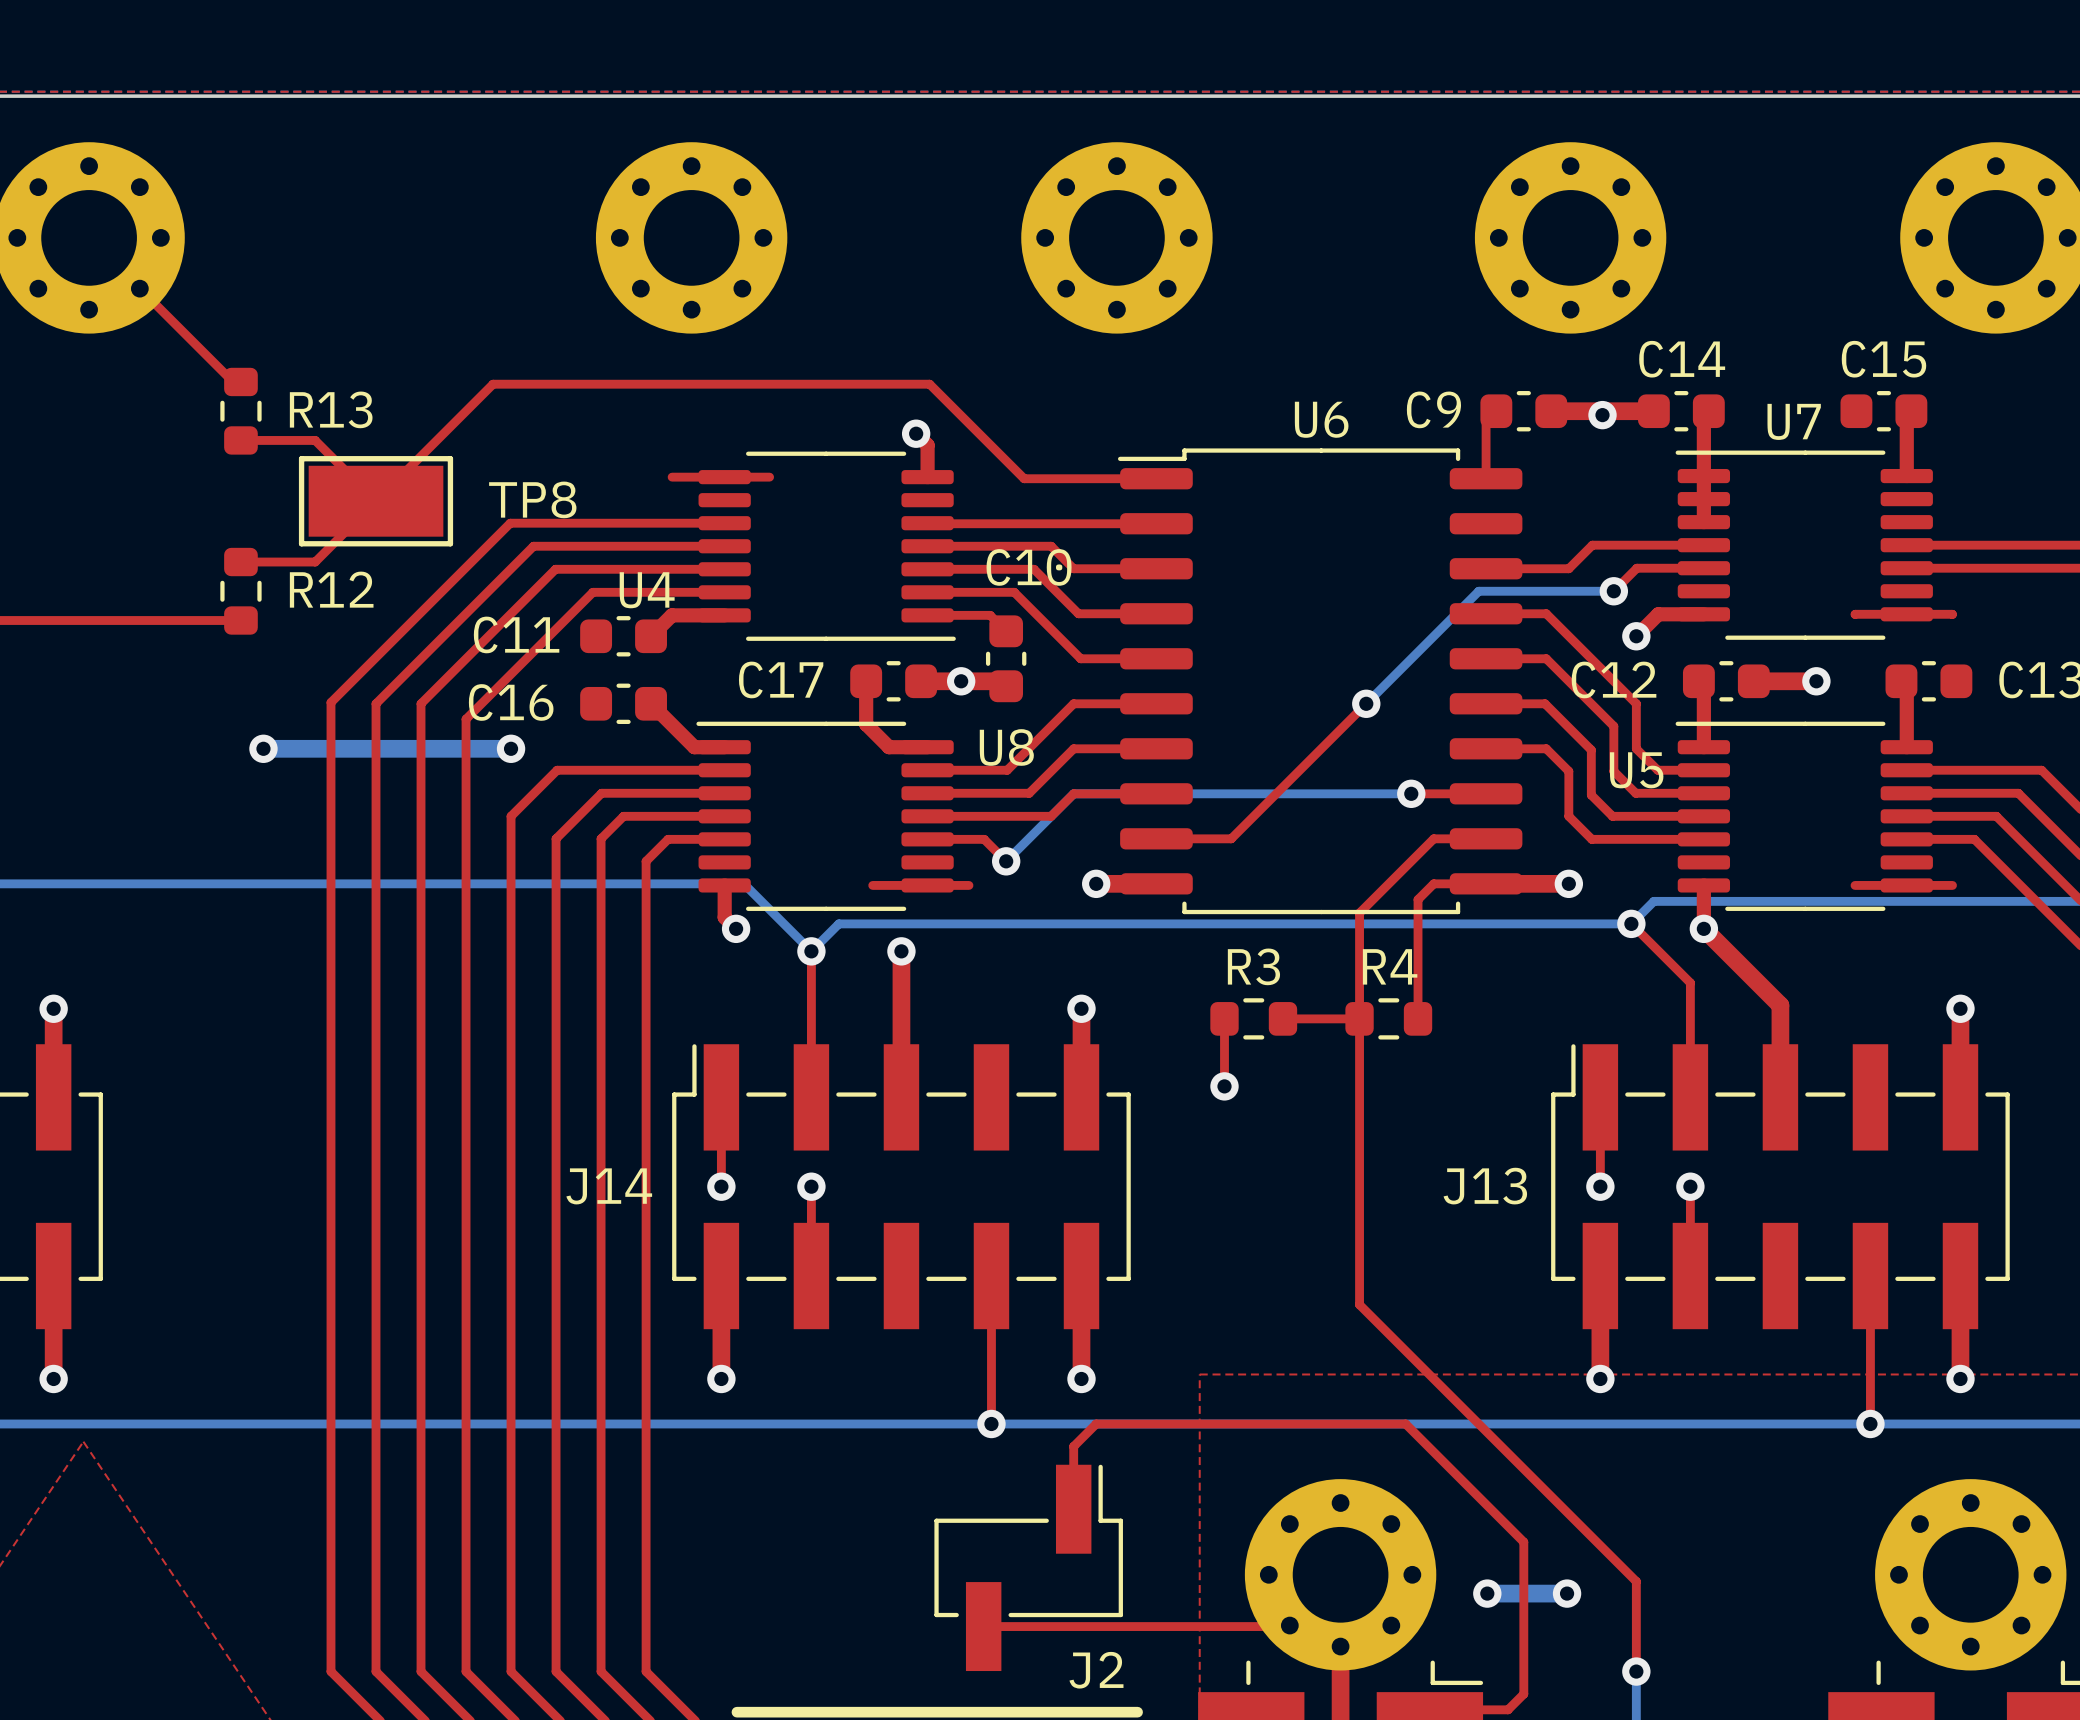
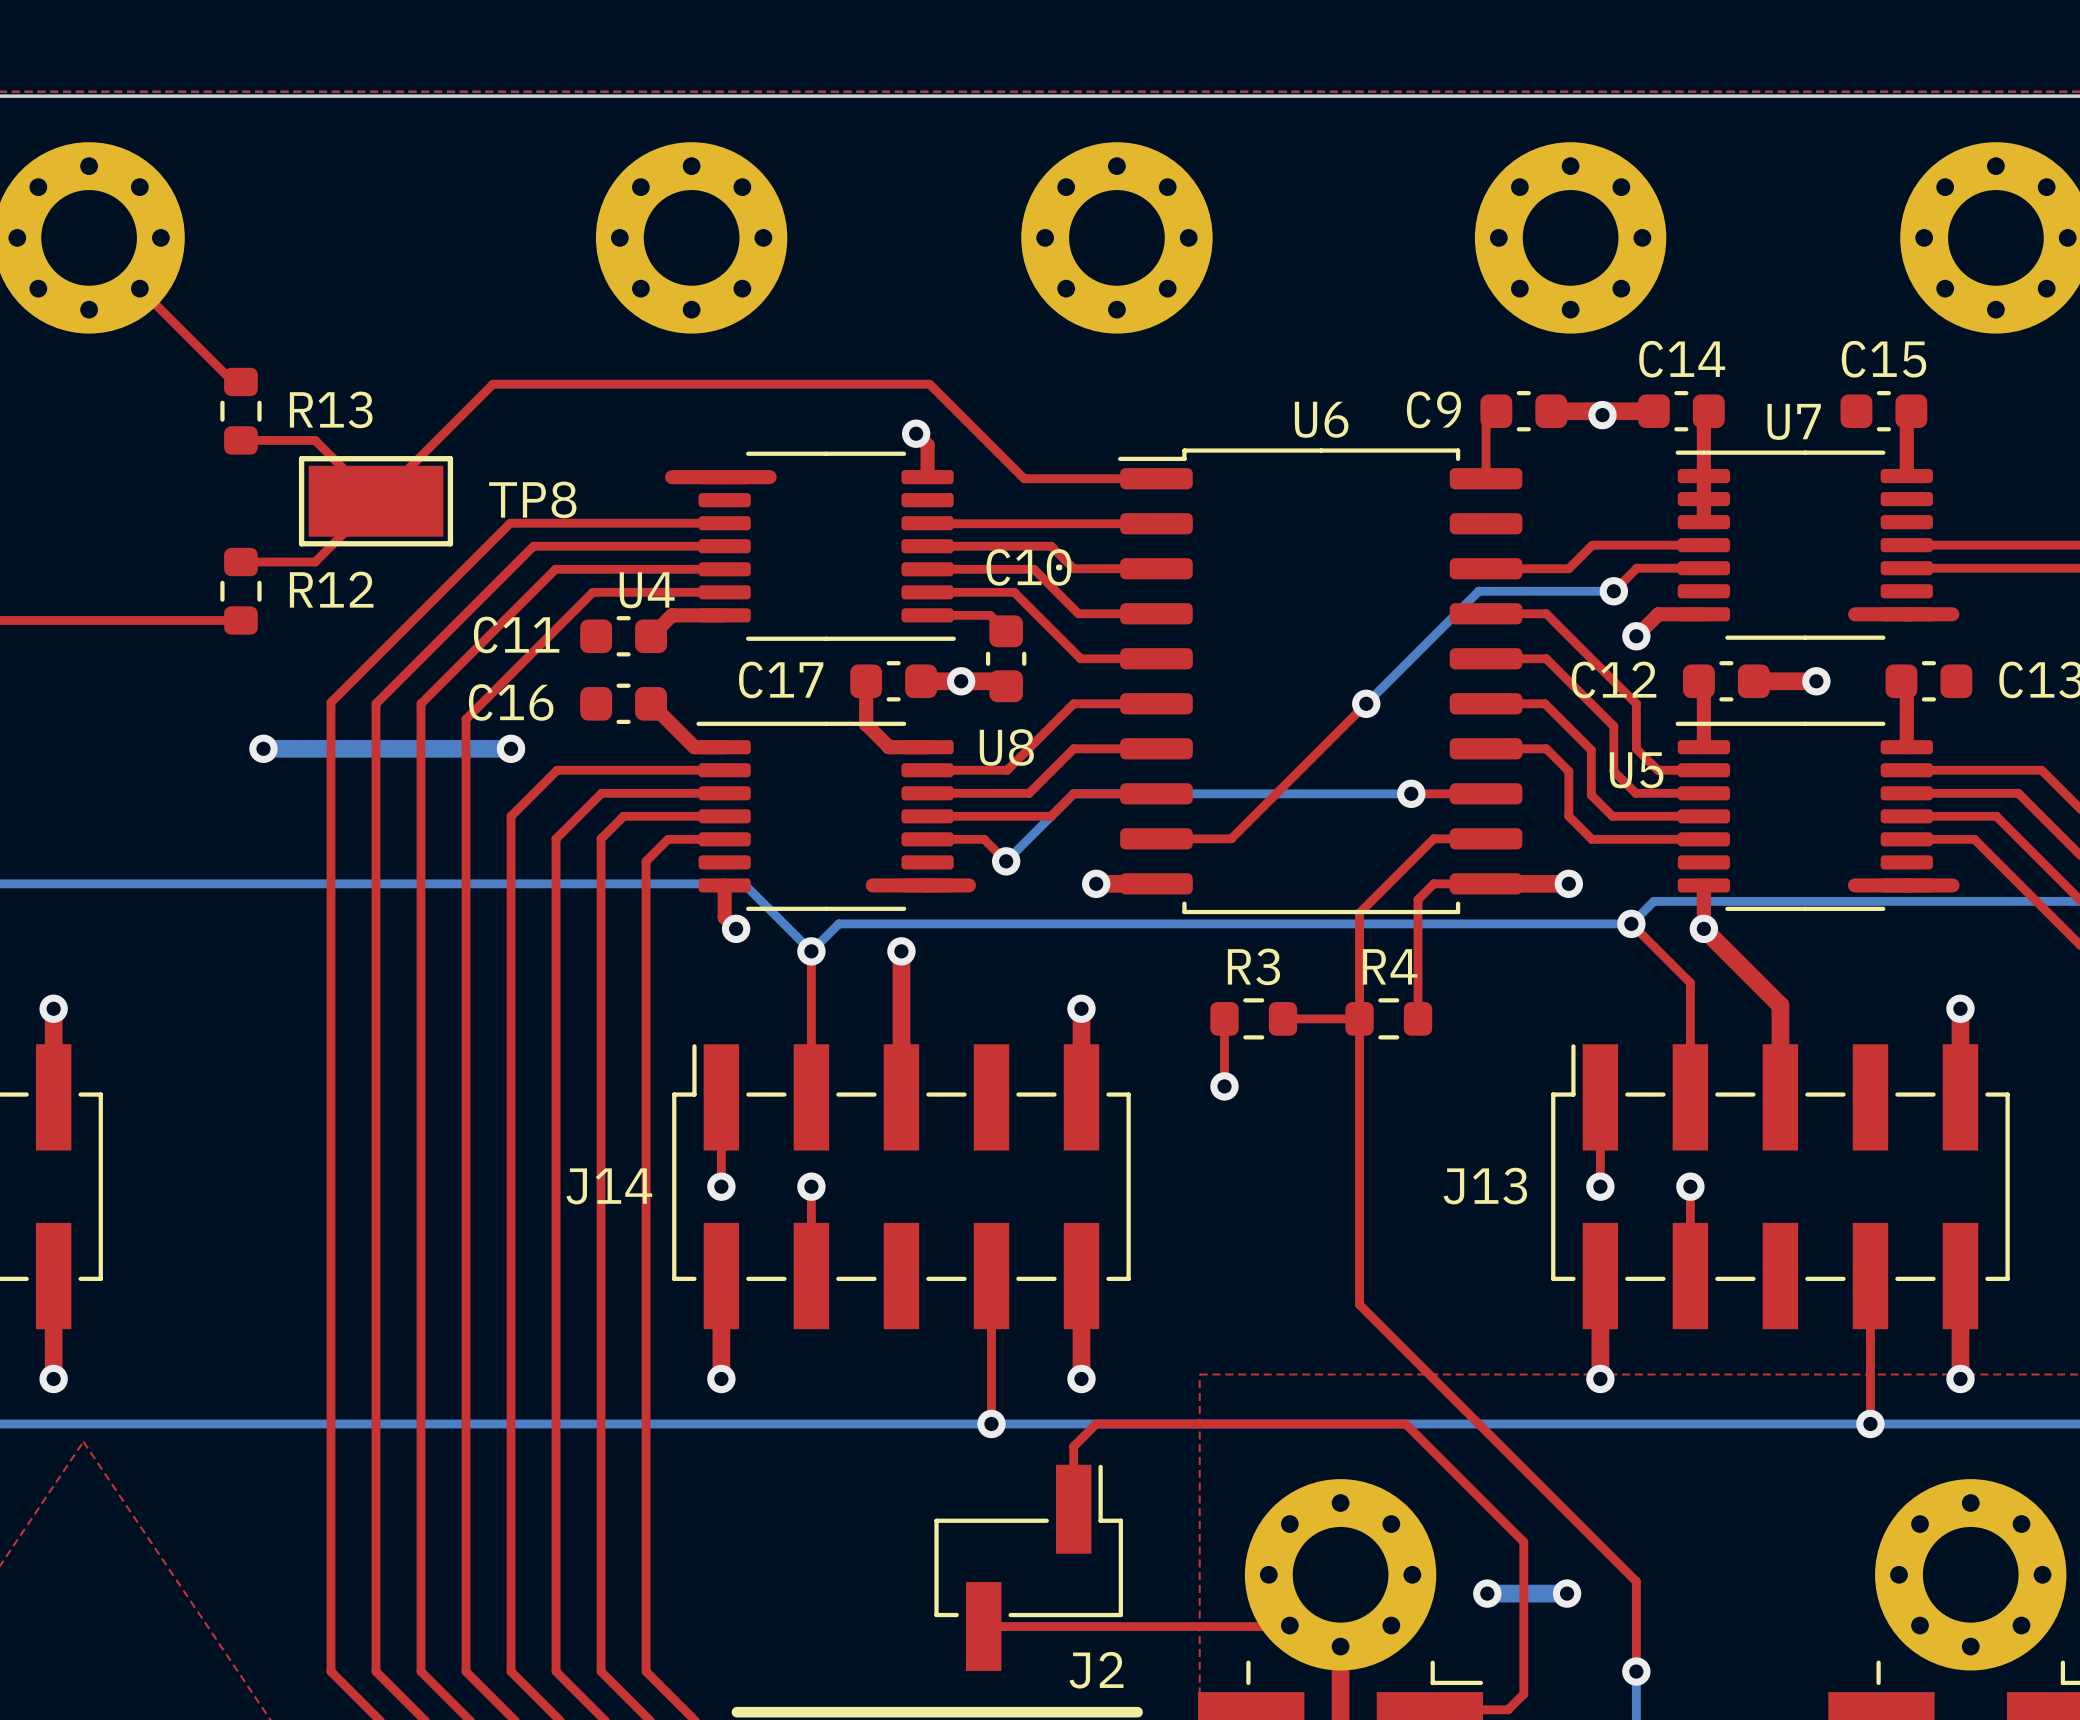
top track width: thin (672, 477) (769, 477) -> thick (672, 477) (769, 477)
top track width: thin (1855, 614) (1952, 614) -> thick (1855, 614) (1952, 614)
top track width: thin (872, 885) (968, 885) -> thick (872, 885) (968, 885)
top track width: thin (1855, 885) (1952, 885) -> thick (1855, 885) (1952, 885)

